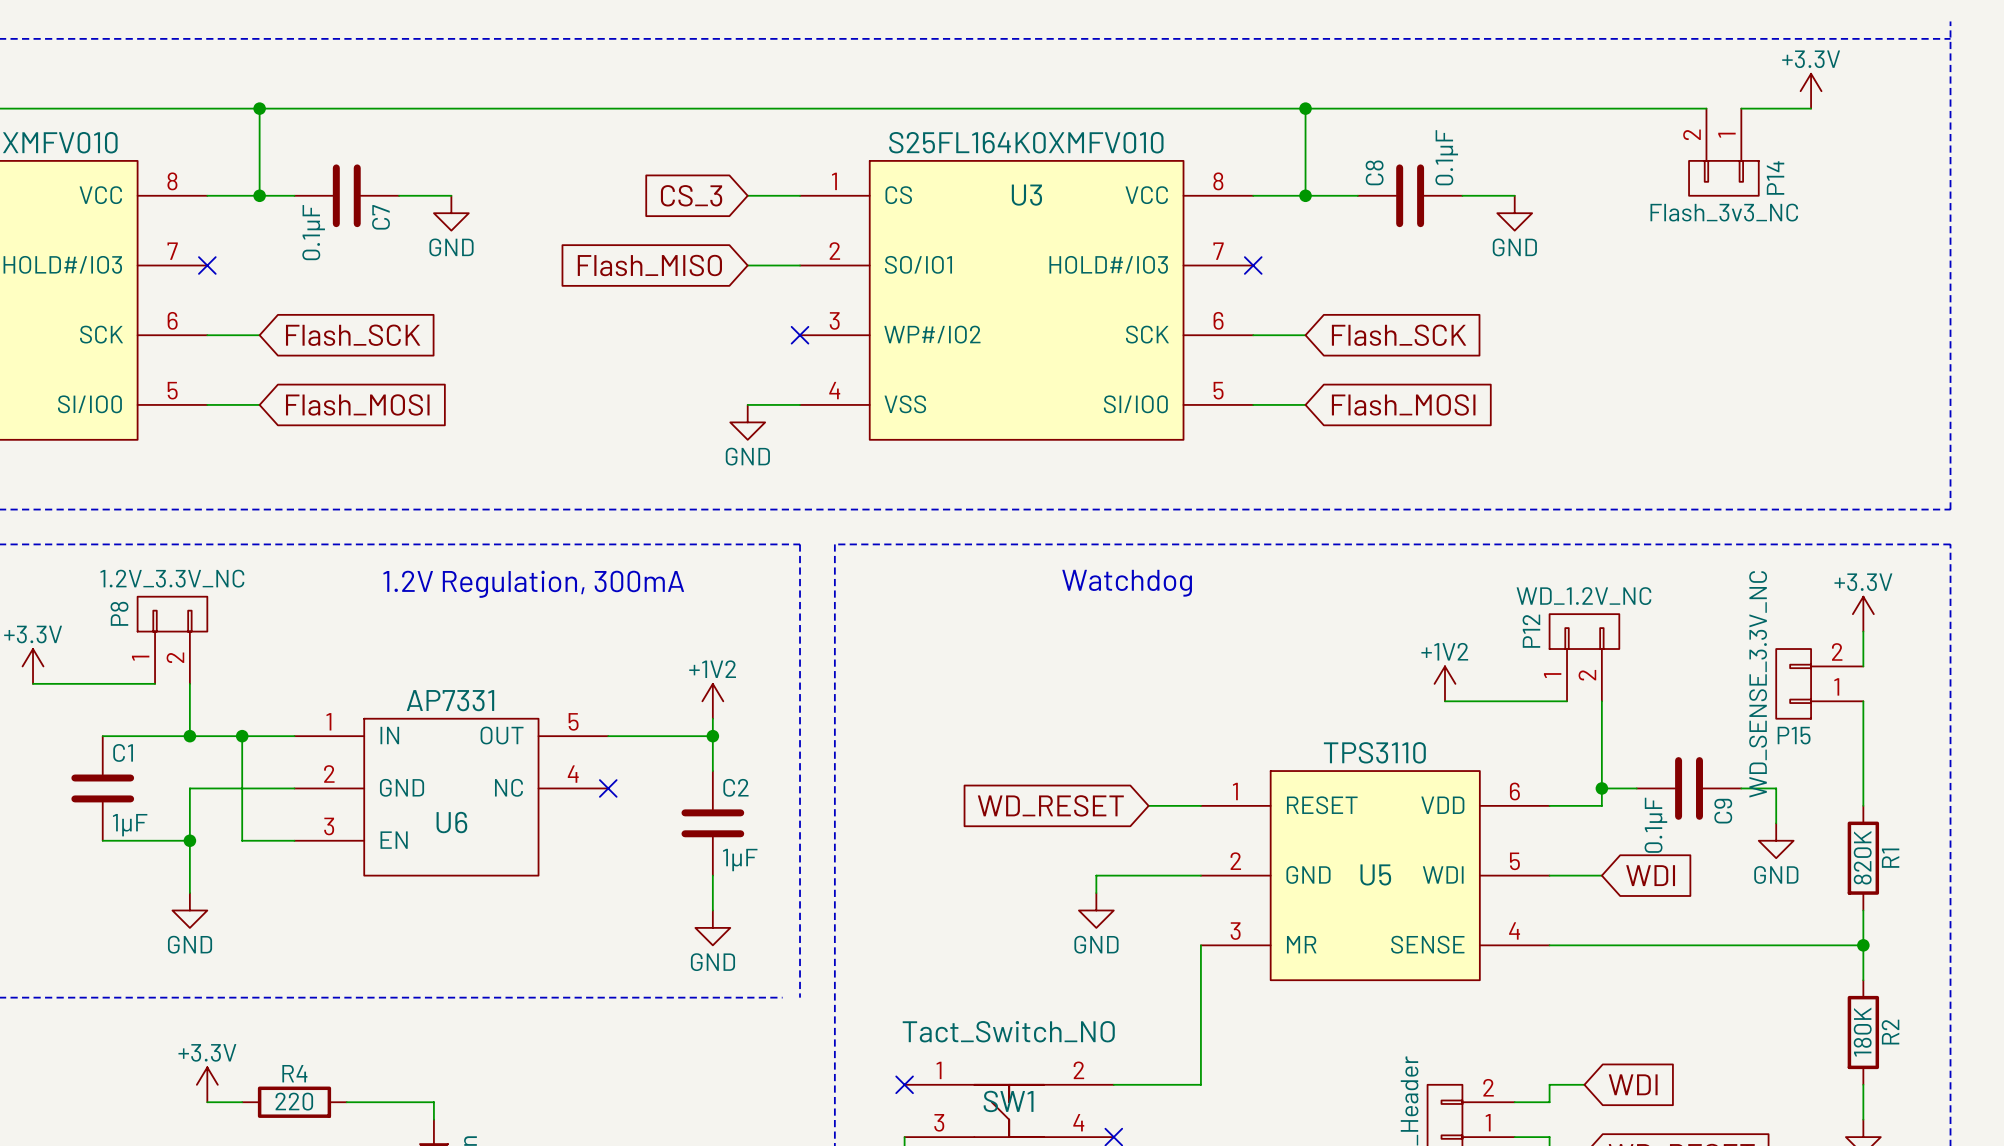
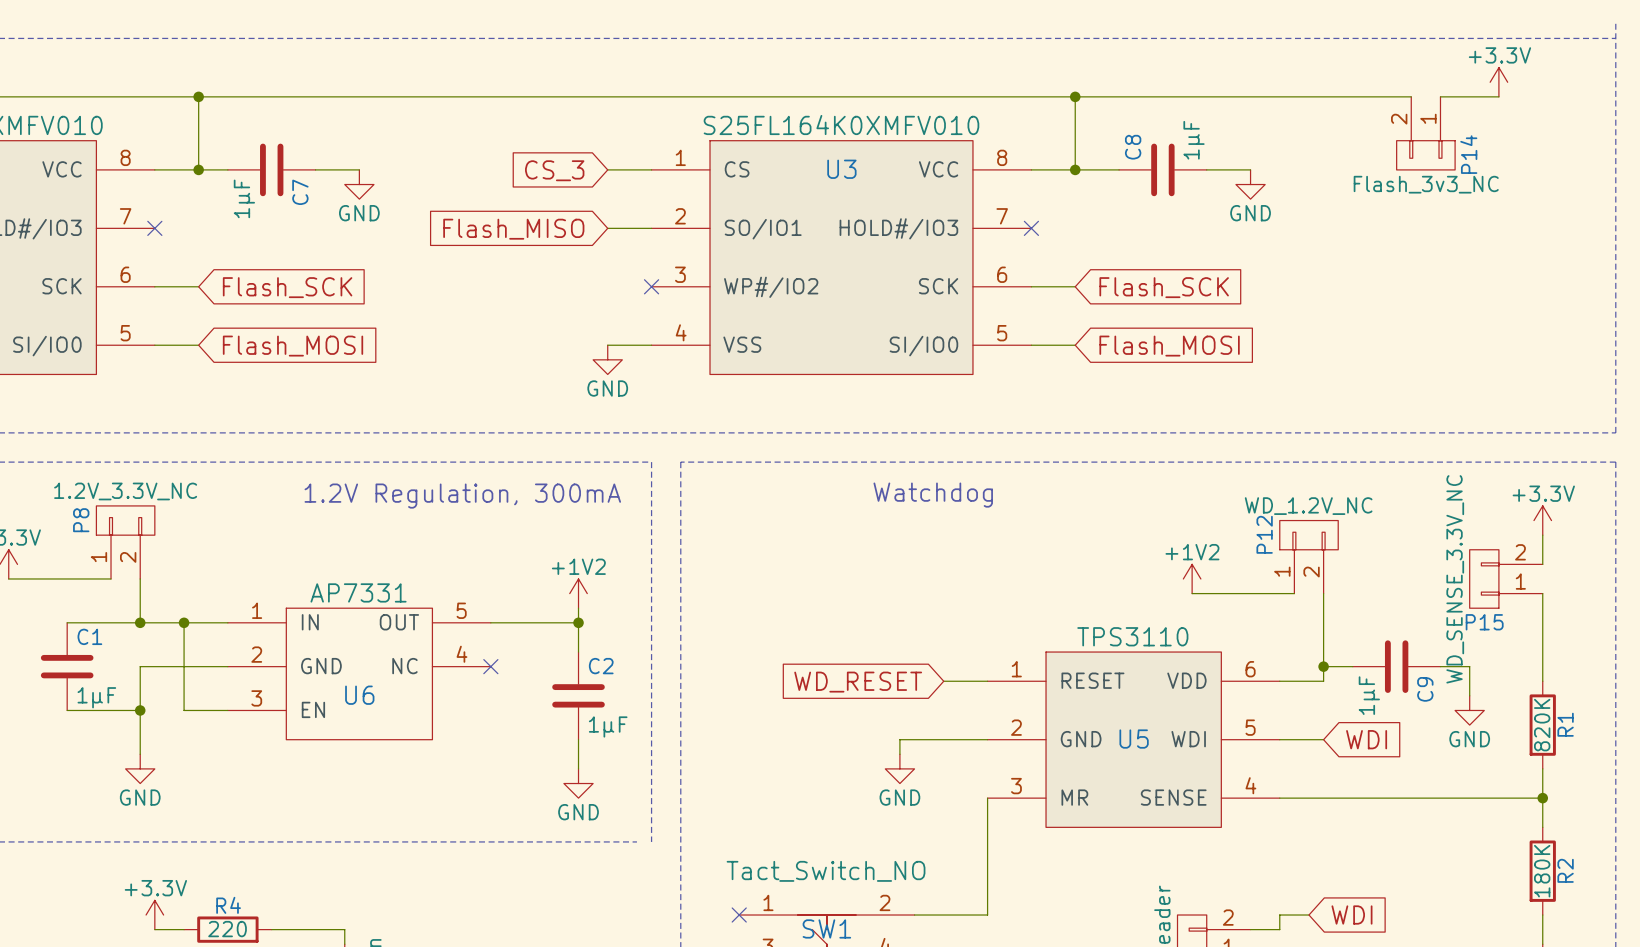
C8 value: 0.1µF (1446, 157) -> 1µF (1194, 140)
C7 value: 0.1µF (313, 232) -> 1µF (244, 198)
C9 value: 0.1µF (1655, 825) -> 1µF (1369, 695)

